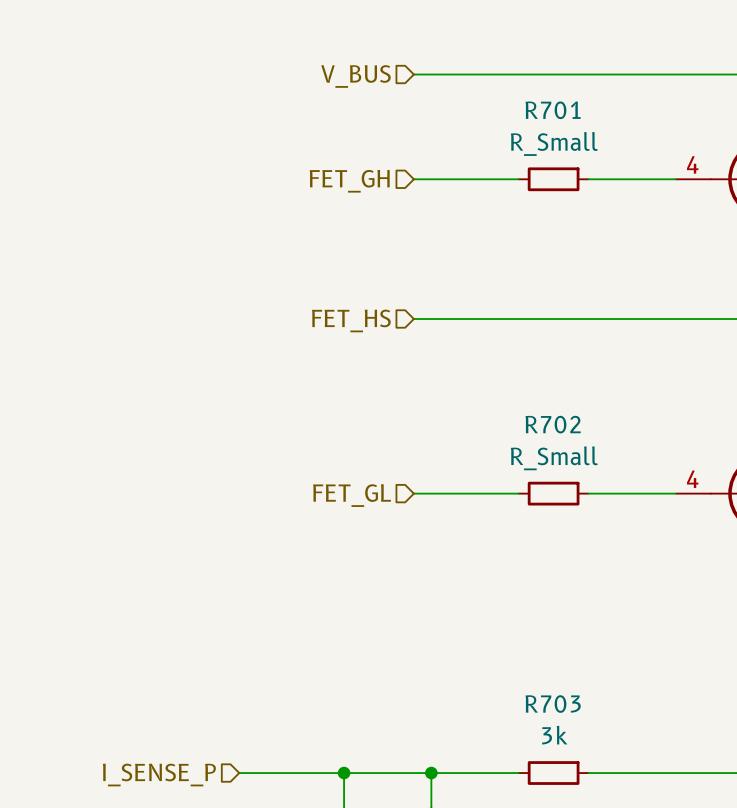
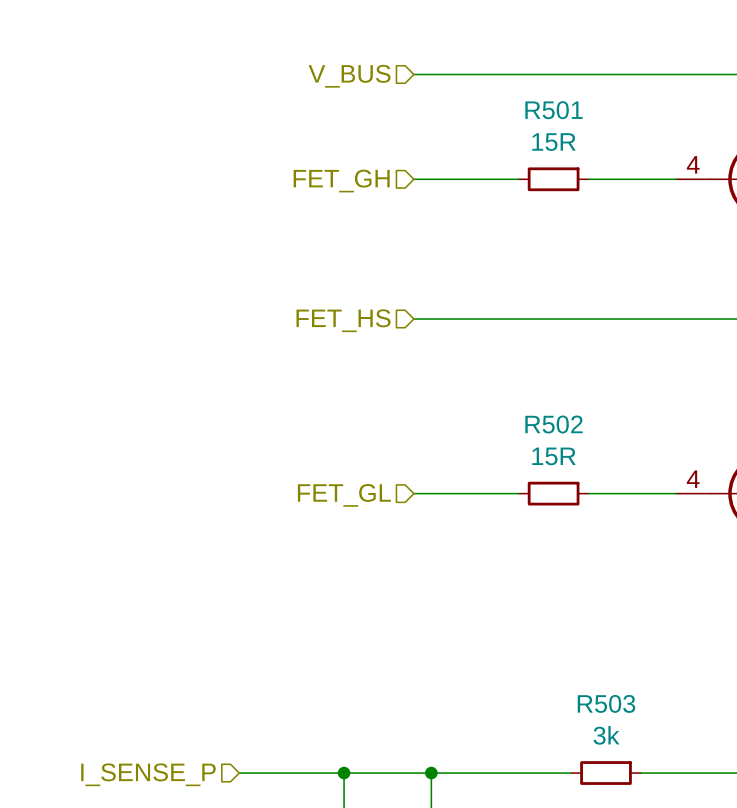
R701 name: R701 (553, 110) -> R501 (554, 110)
R701 value: R_Small (554, 144) -> 15R (553, 142)
R702 name: R702 (553, 424) -> R502 (554, 424)
R702 value: R_Small (554, 458) -> 15R (553, 456)
R703: 3k (553, 773) -> none
wire: (588, 773) (640, 773) -> (518, 773) (571, 773)
R503: none -> 3k (606, 773)

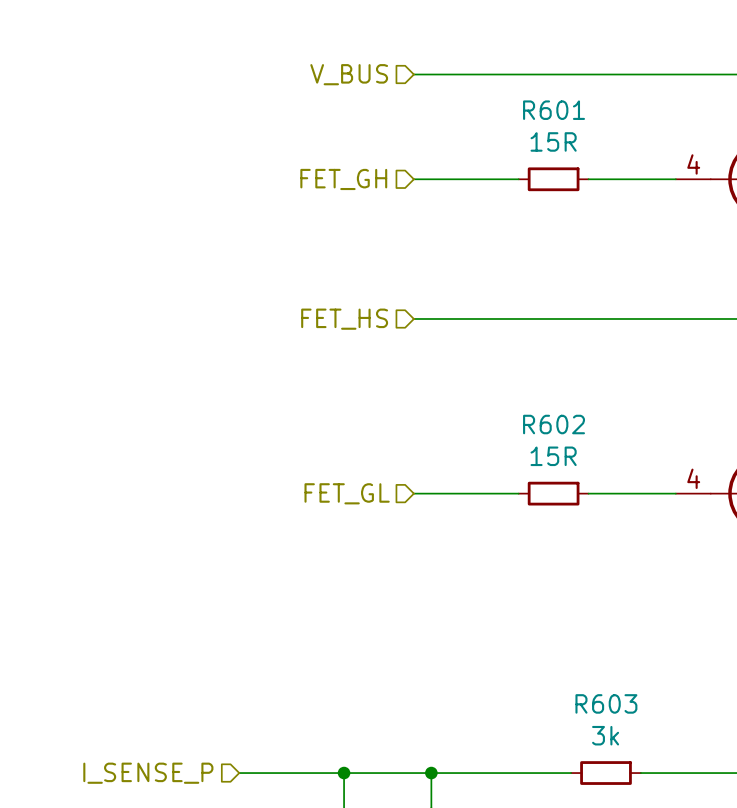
R501 name: R501 (554, 110) -> R601 (554, 110)
R502 name: R502 (554, 424) -> R602 (554, 424)
R503 name: R503 (606, 703) -> R603 (606, 703)

